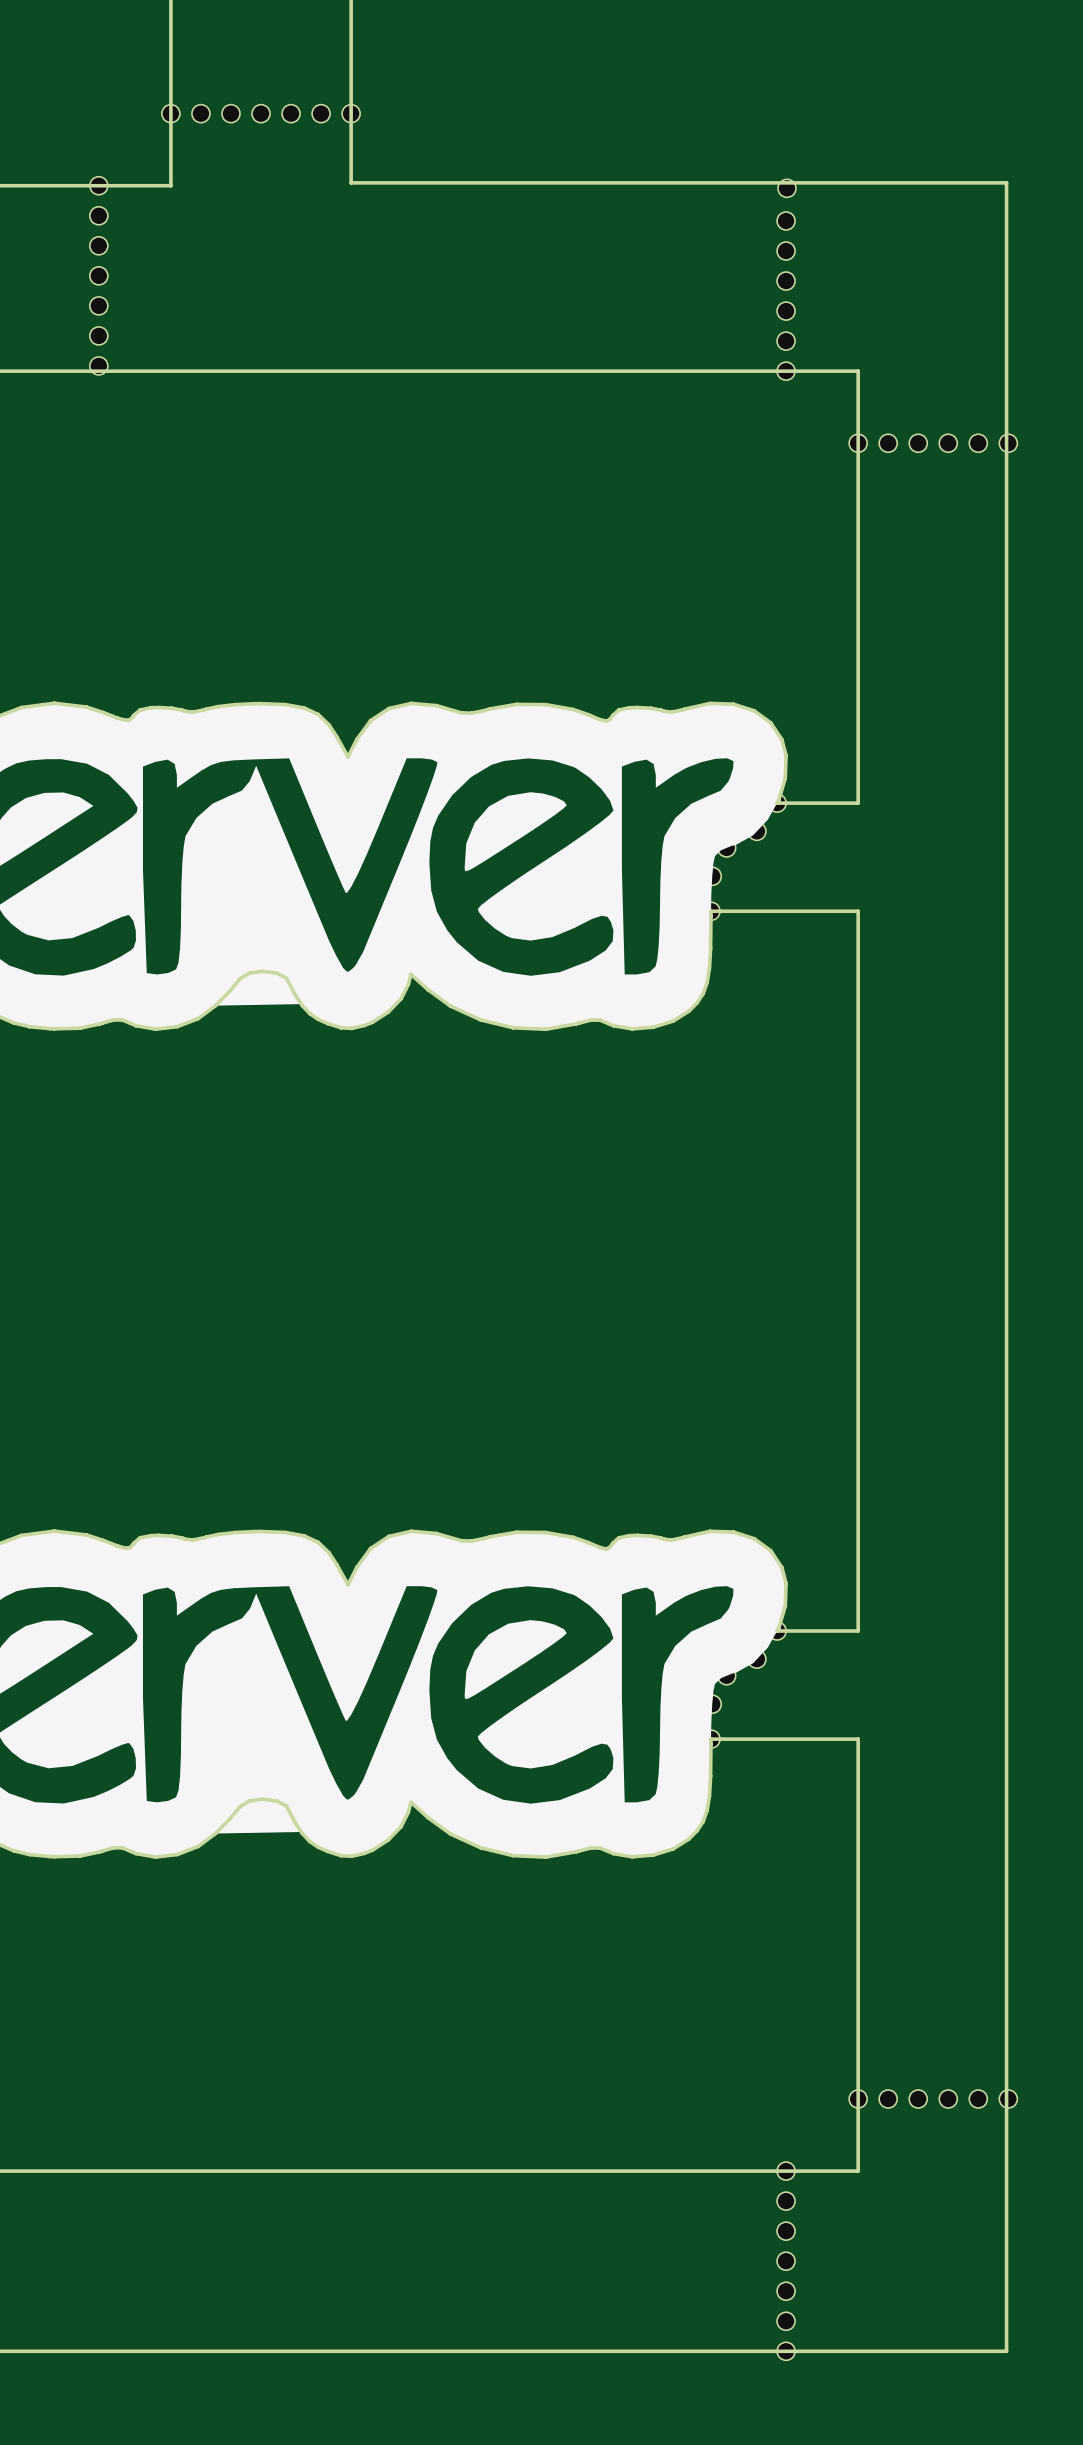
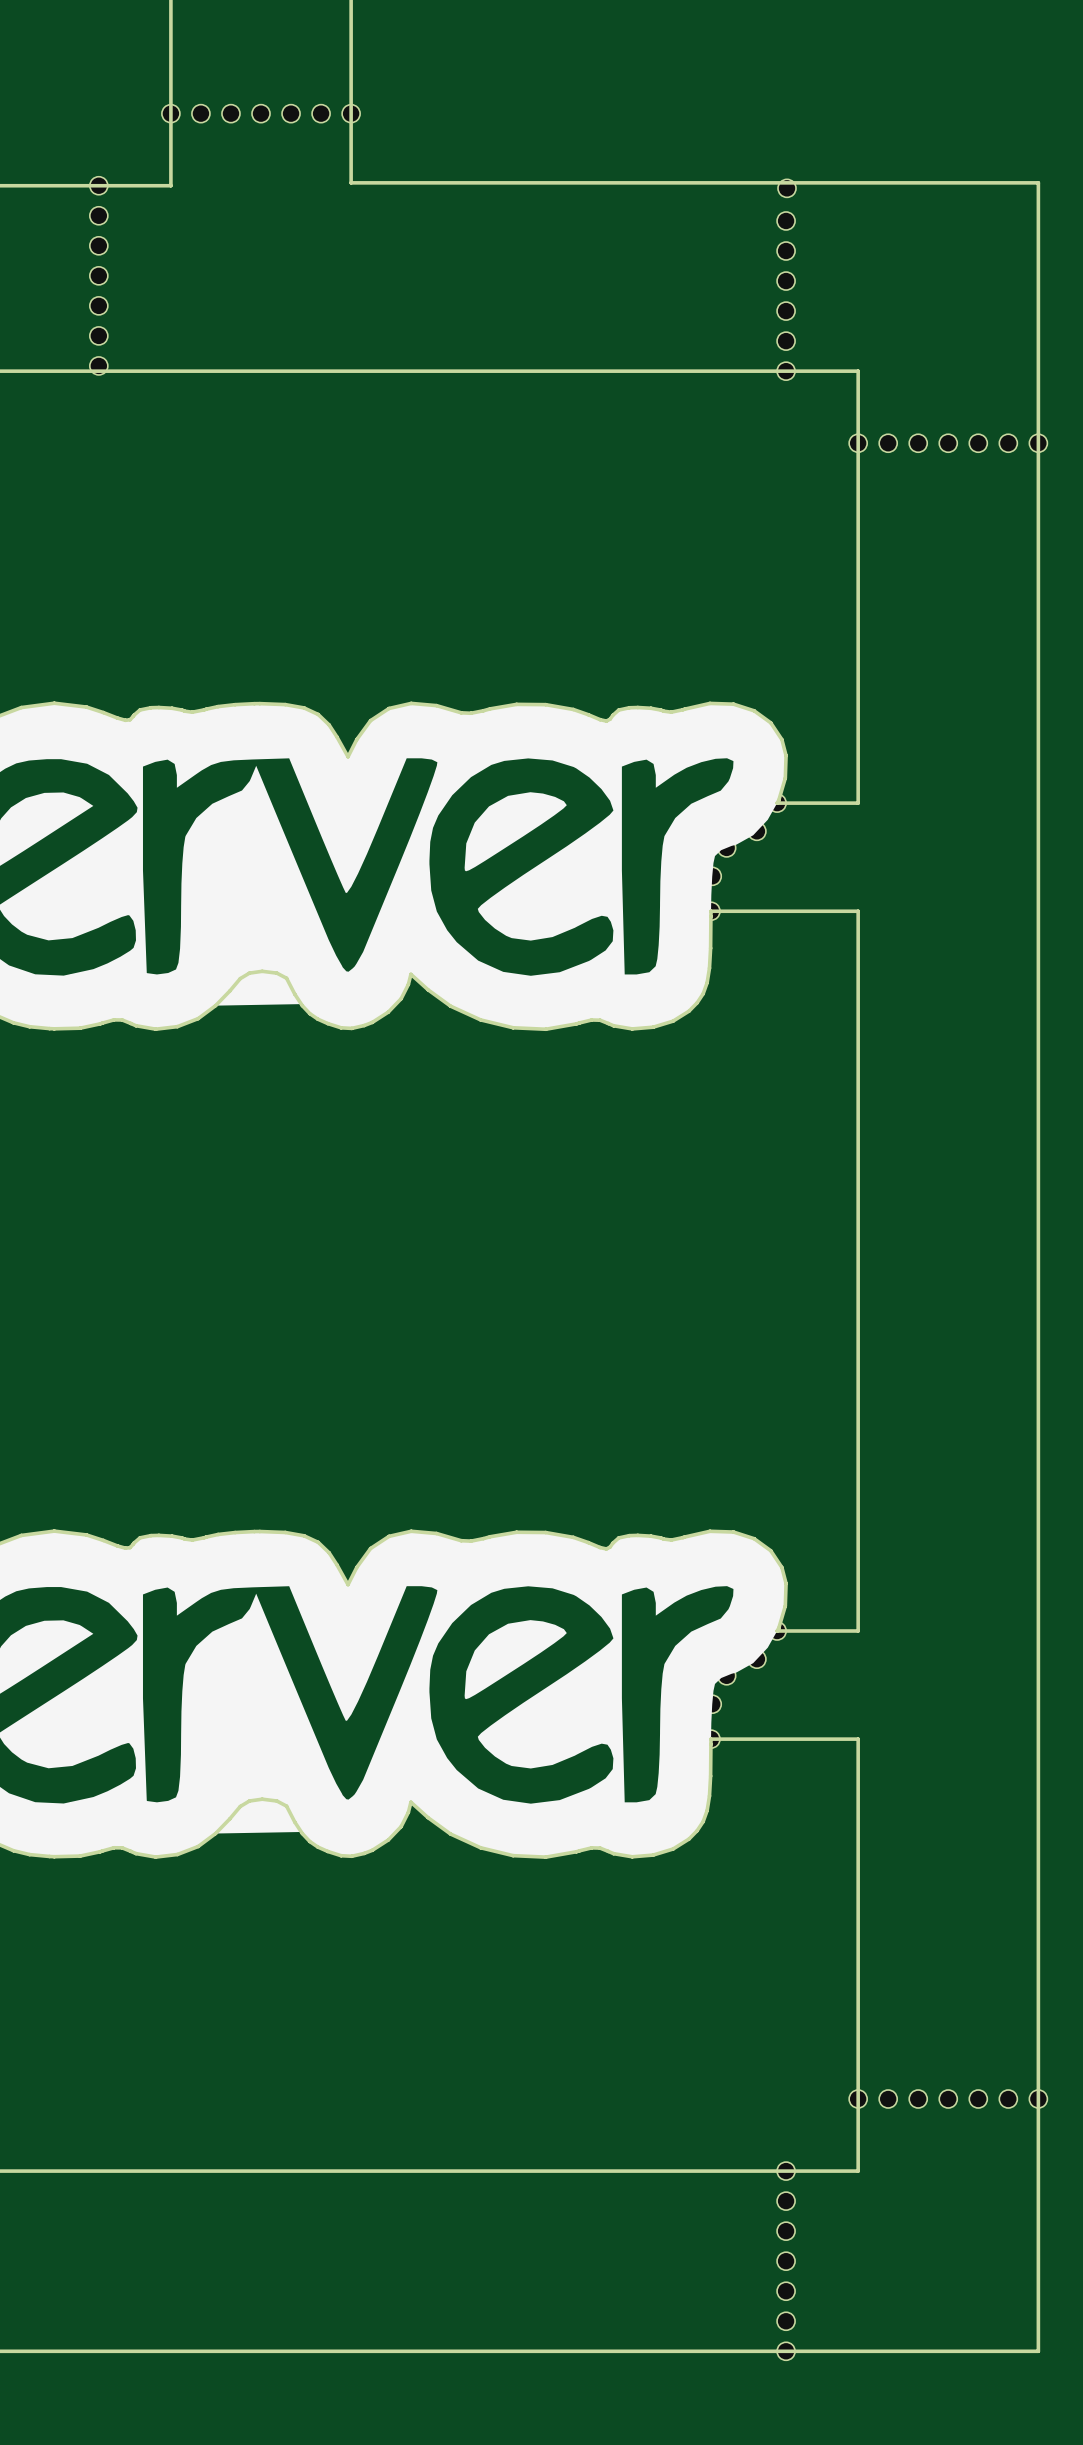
board edge: (1006, 182) (1006, 2351) -> (1006, 182) (1038, 182) (1038, 2351) (1006, 2351)
part: none -> (1038, 443)
part: none -> (1038, 2099)

